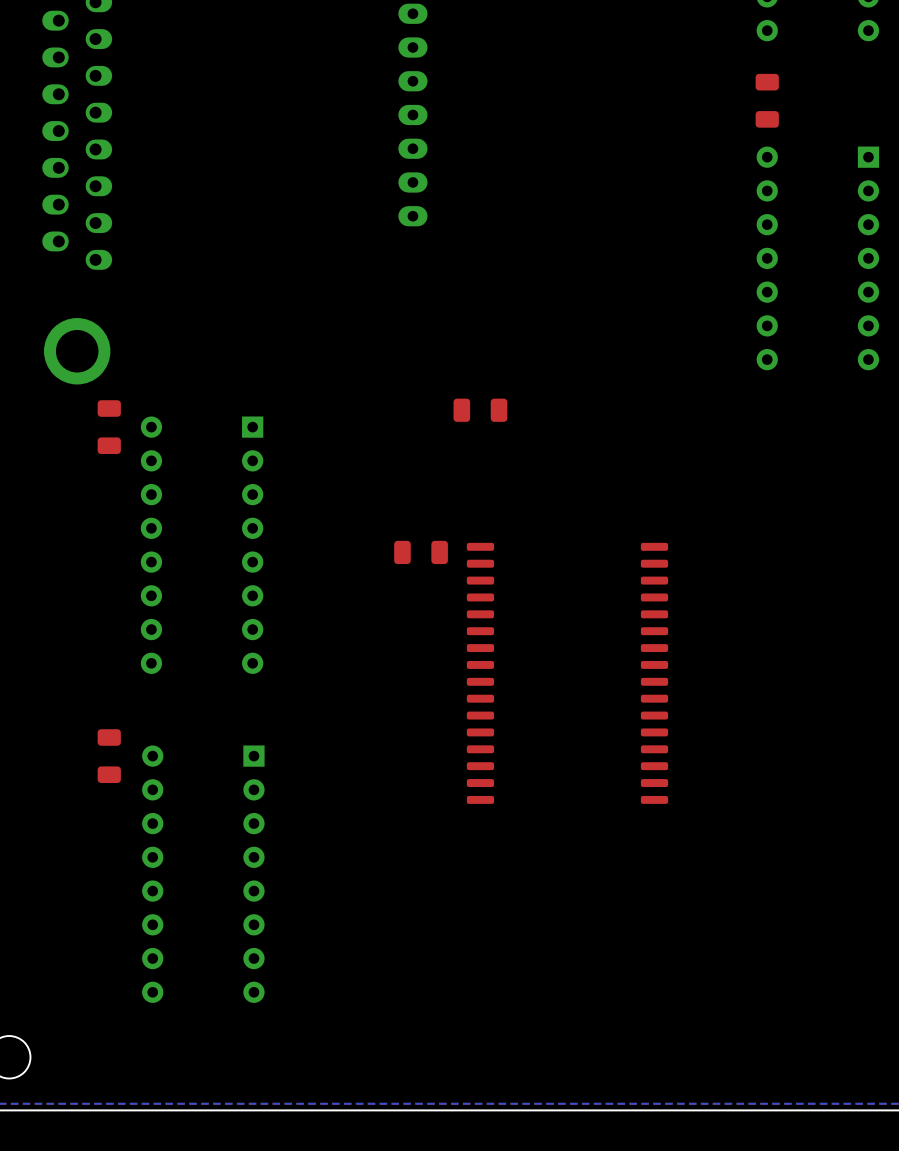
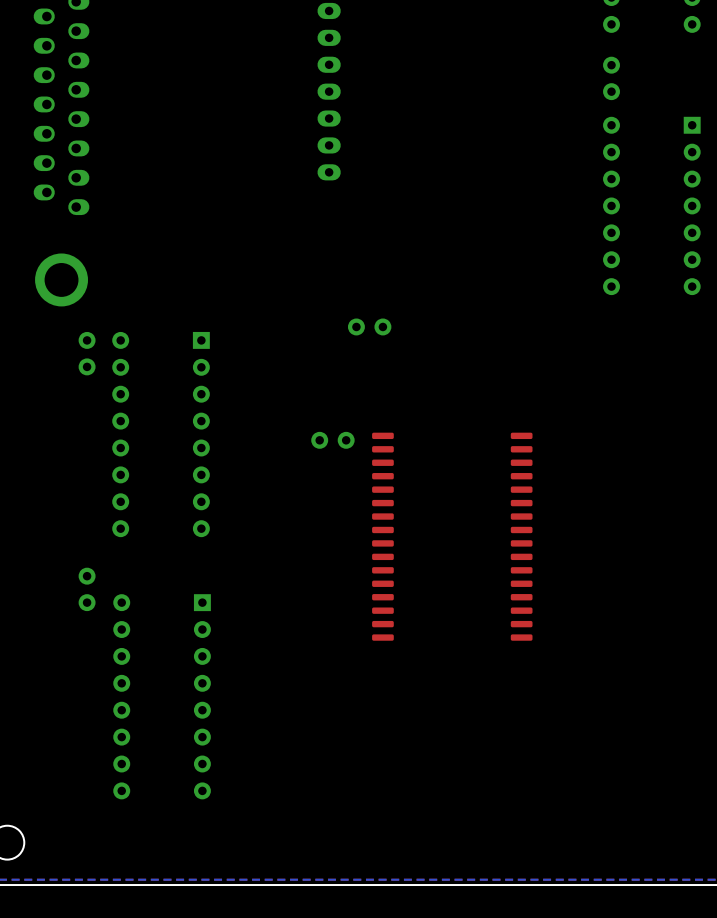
part footprint: [755, 73, 779, 128] -> [603, 56, 620, 101]
part: none -> (369, 326)
part: (480, 410) -> none
part: (109, 427) -> none
part: none -> (87, 353)
part footprint: [394, 540, 448, 565] -> [311, 431, 355, 449]
part: none -> (87, 589)
part: (109, 756) -> none

